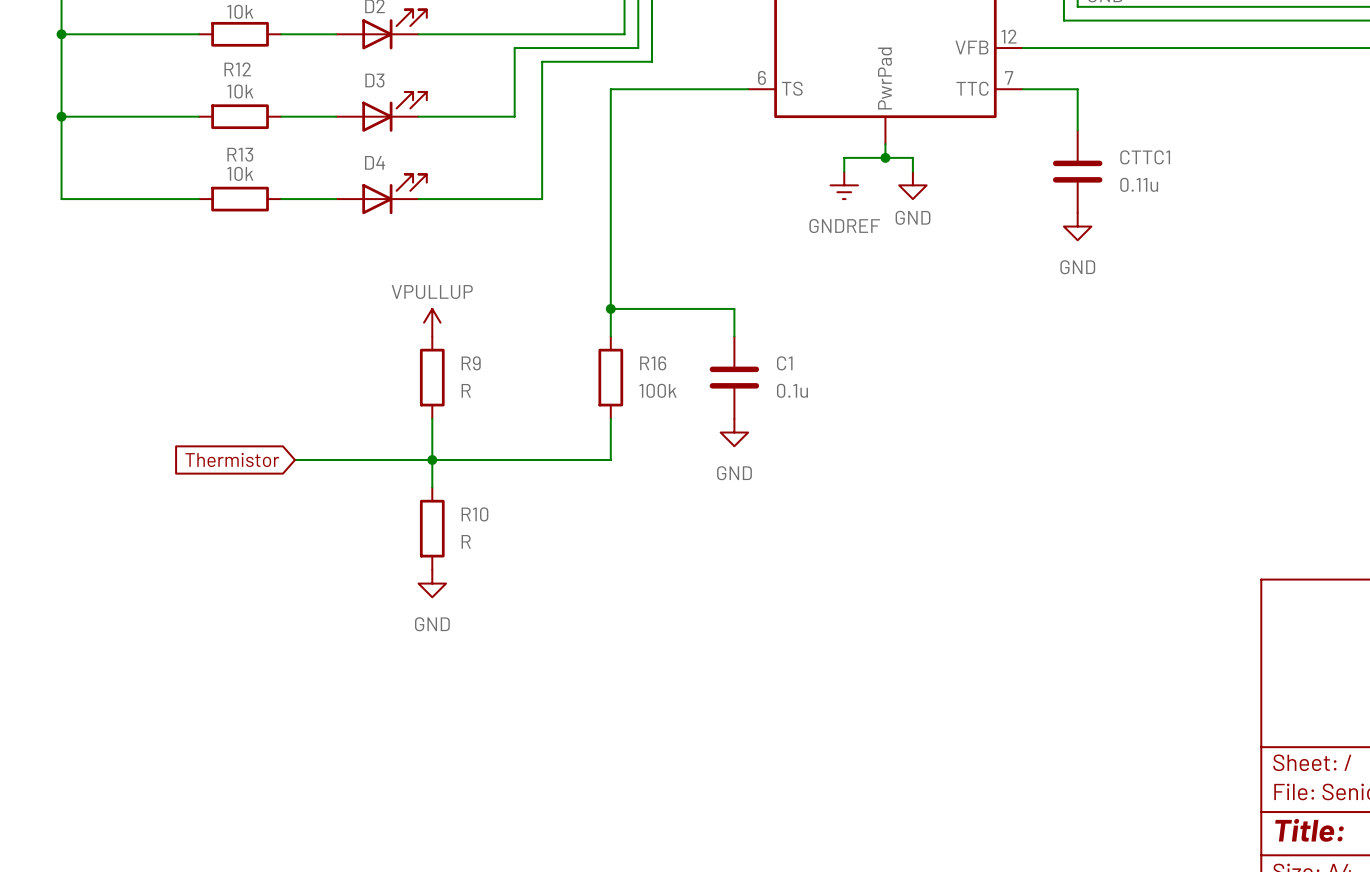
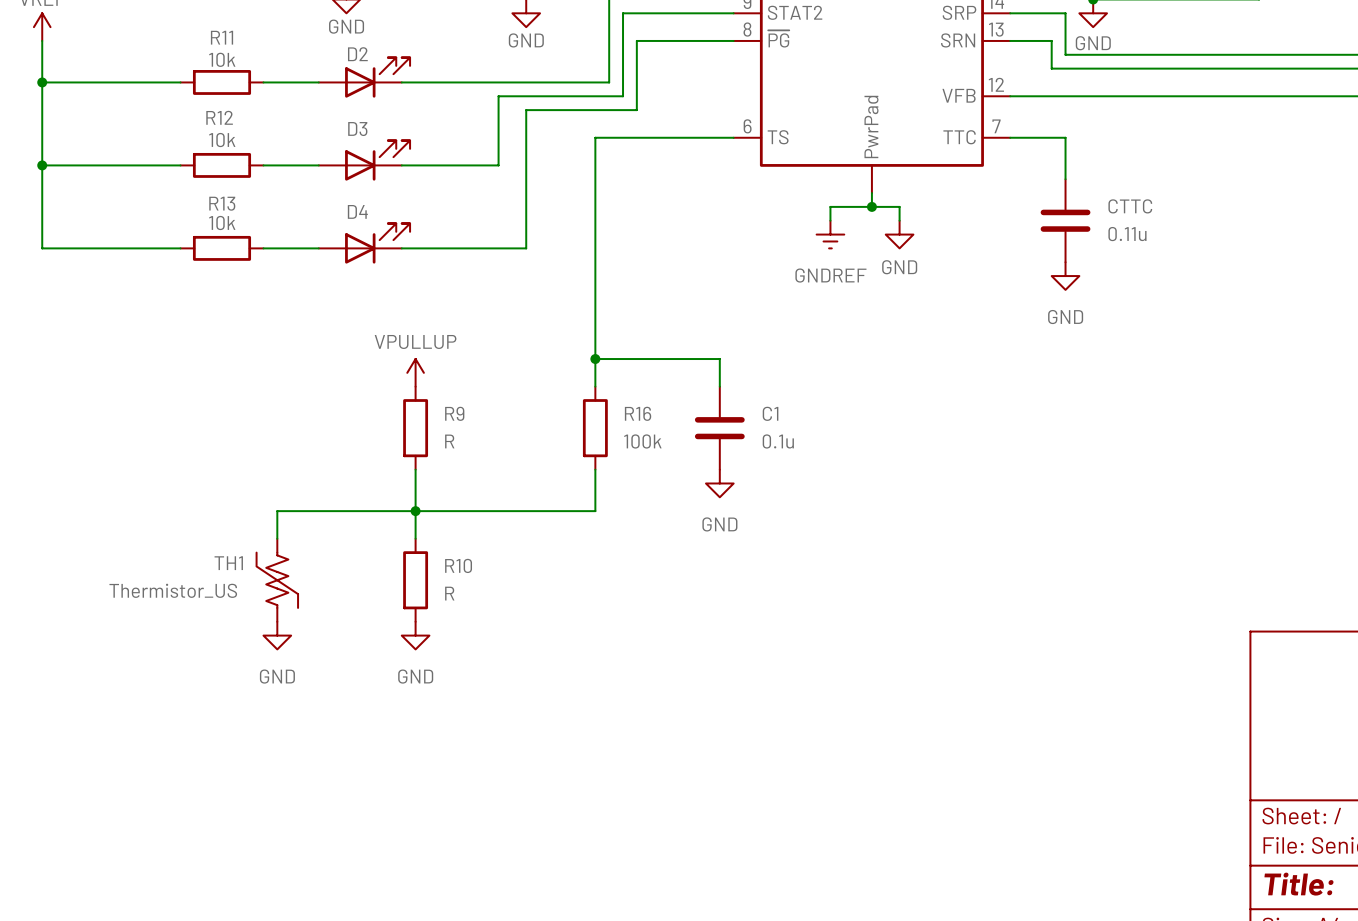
CTTC1 name: CTTC1 (1145, 157) -> CTTC (1130, 206)
global label: Thermistor (232, 459) -> none
wire: none -> (277, 511) (277, 538)
TH1: none -> Thermistor_US (277, 580)
power symbol: none -> GND (277, 635)

